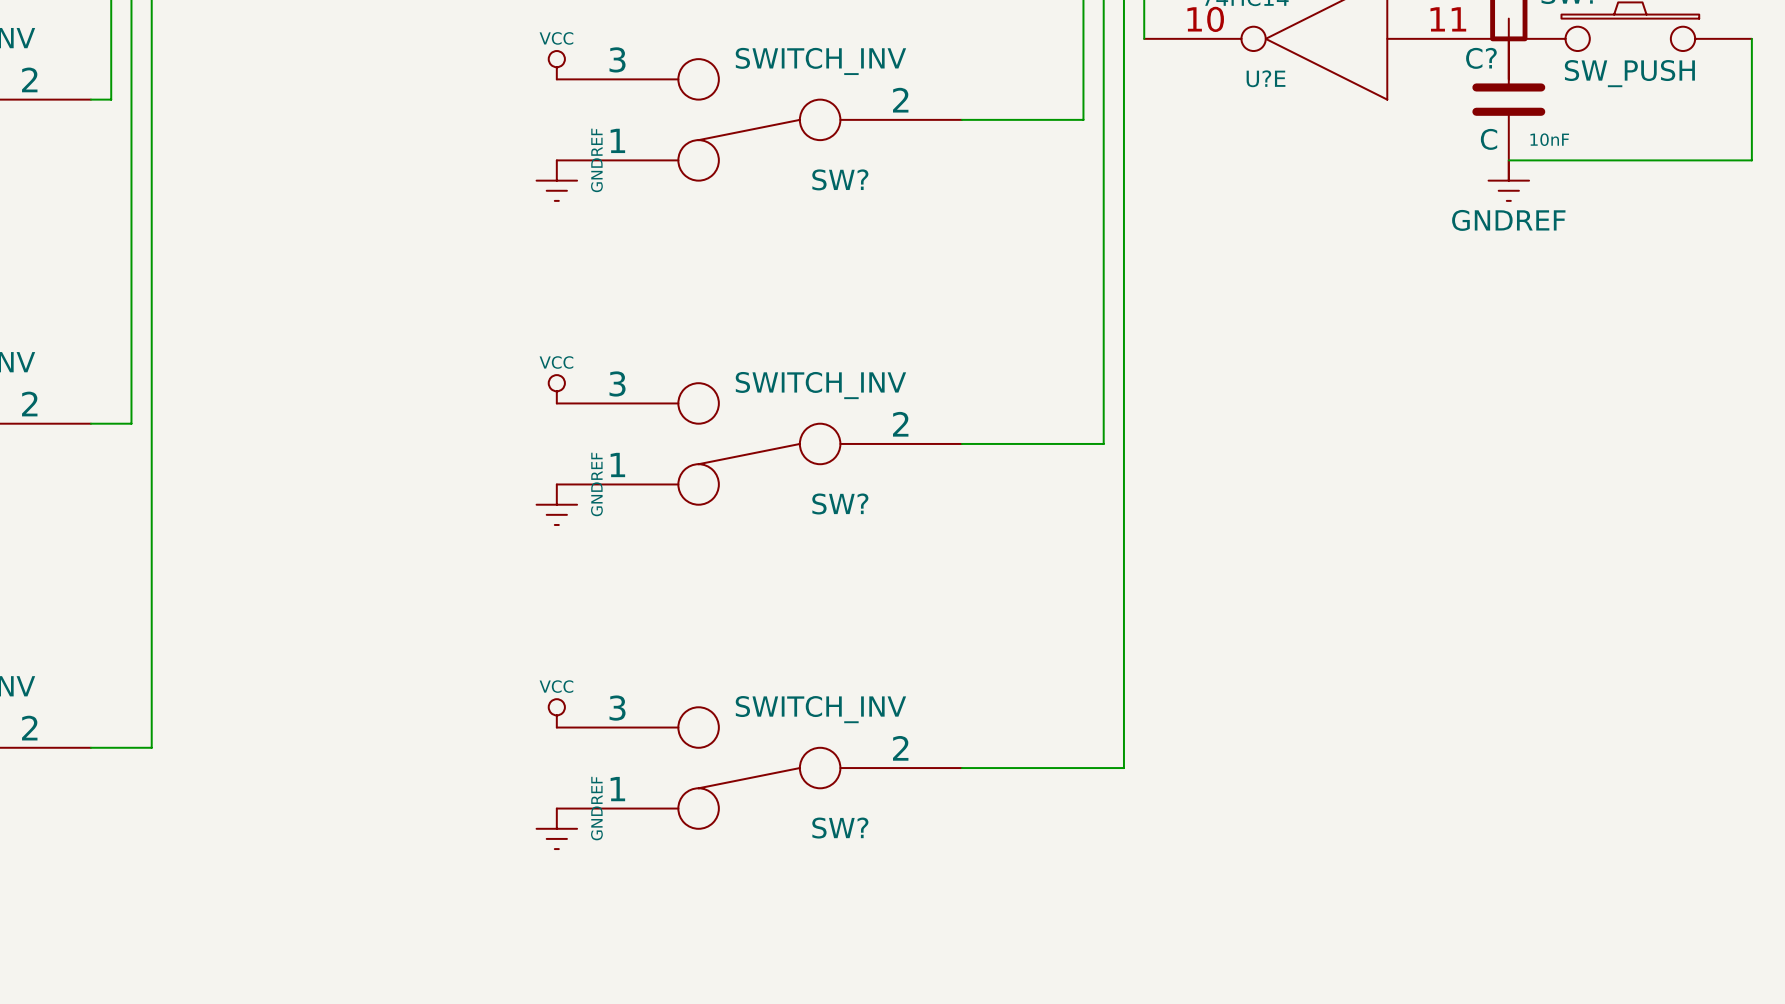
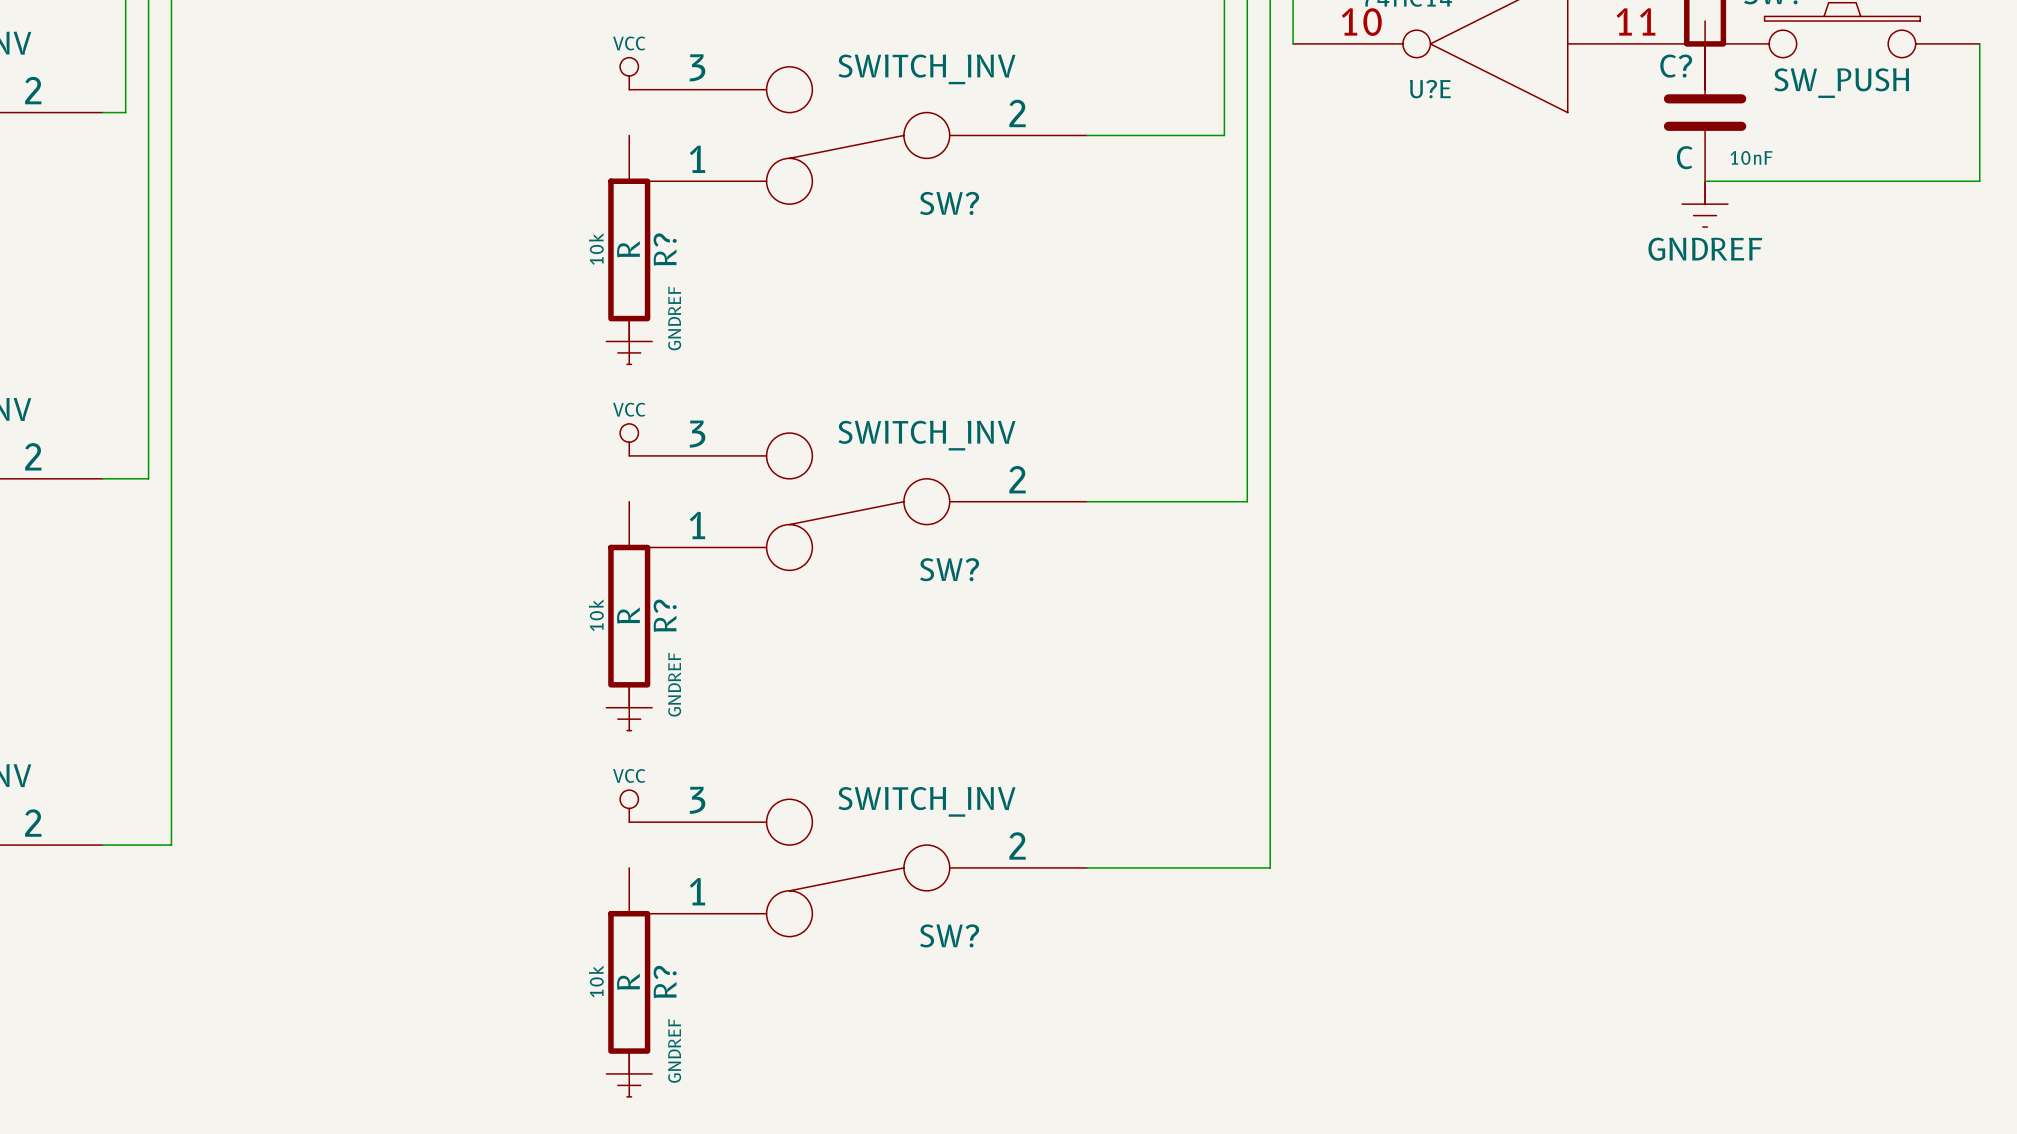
power symbol: GNDREF (556, 180) -> none
R?: none -> R (629, 249)
power symbol: none -> GNDREF (629, 341)
power symbol: GNDREF (556, 504) -> none
R?: none -> R (629, 616)
power symbol: none -> GNDREF (629, 707)
power symbol: GNDREF (556, 828) -> none
R?: none -> R (629, 982)
power symbol: none -> GNDREF (629, 1073)

